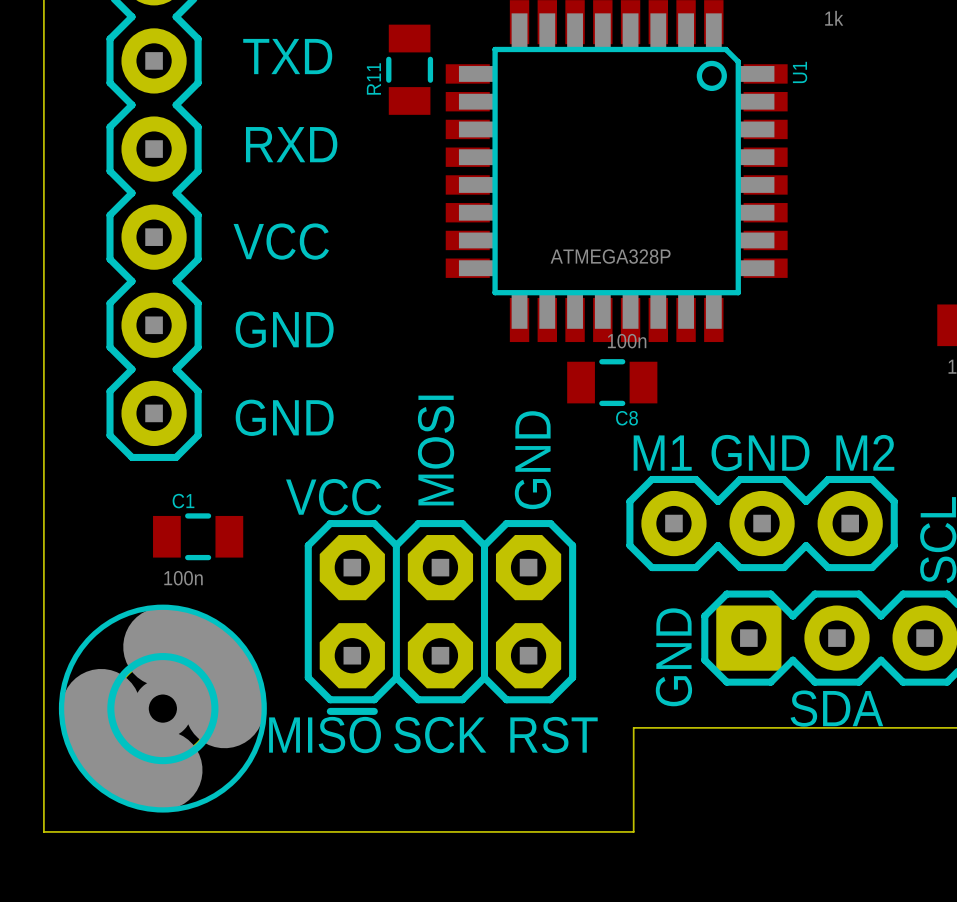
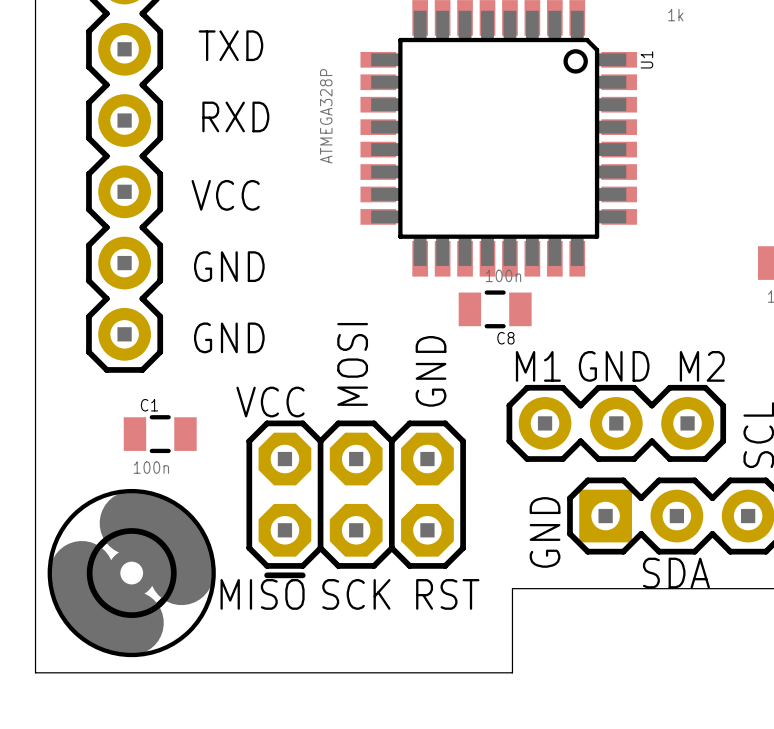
R11: (409, 69) -> none
U1 value rotation: 0° (610, 256) -> 90° counterclockwise (326, 116)
U1 value position: ATMEGA328P (610, 256) -> ATMEGA328P (326, 116)

